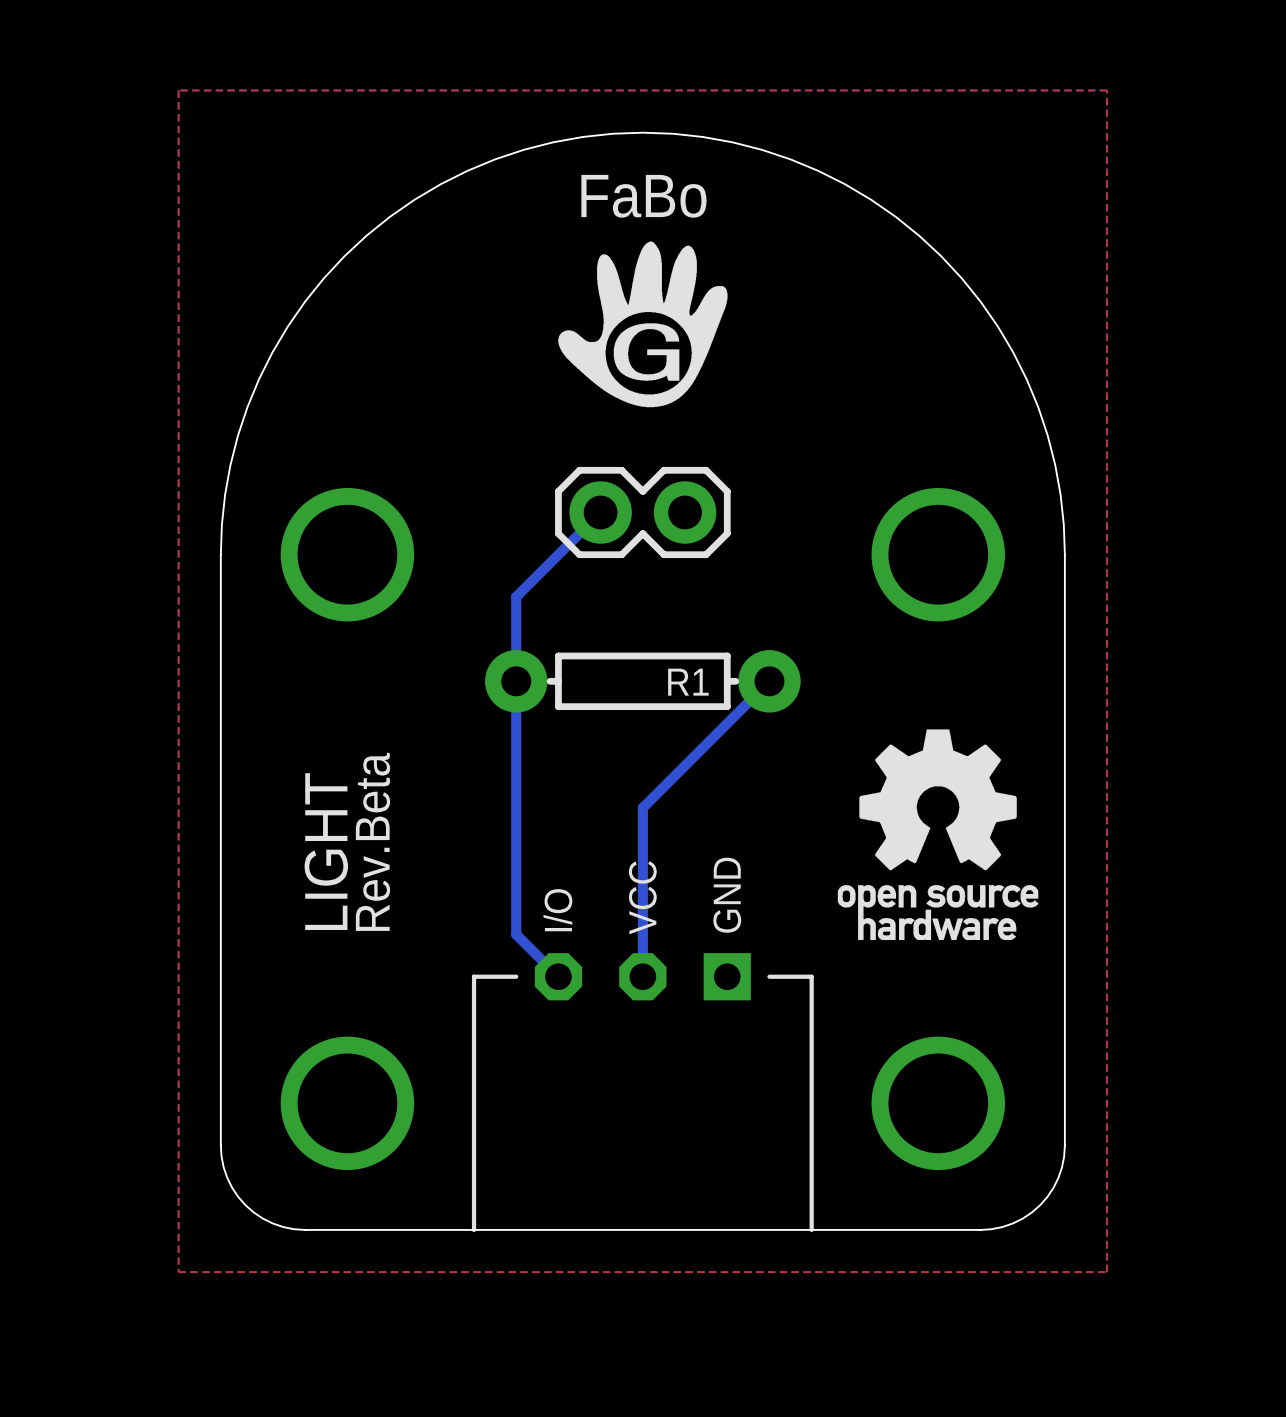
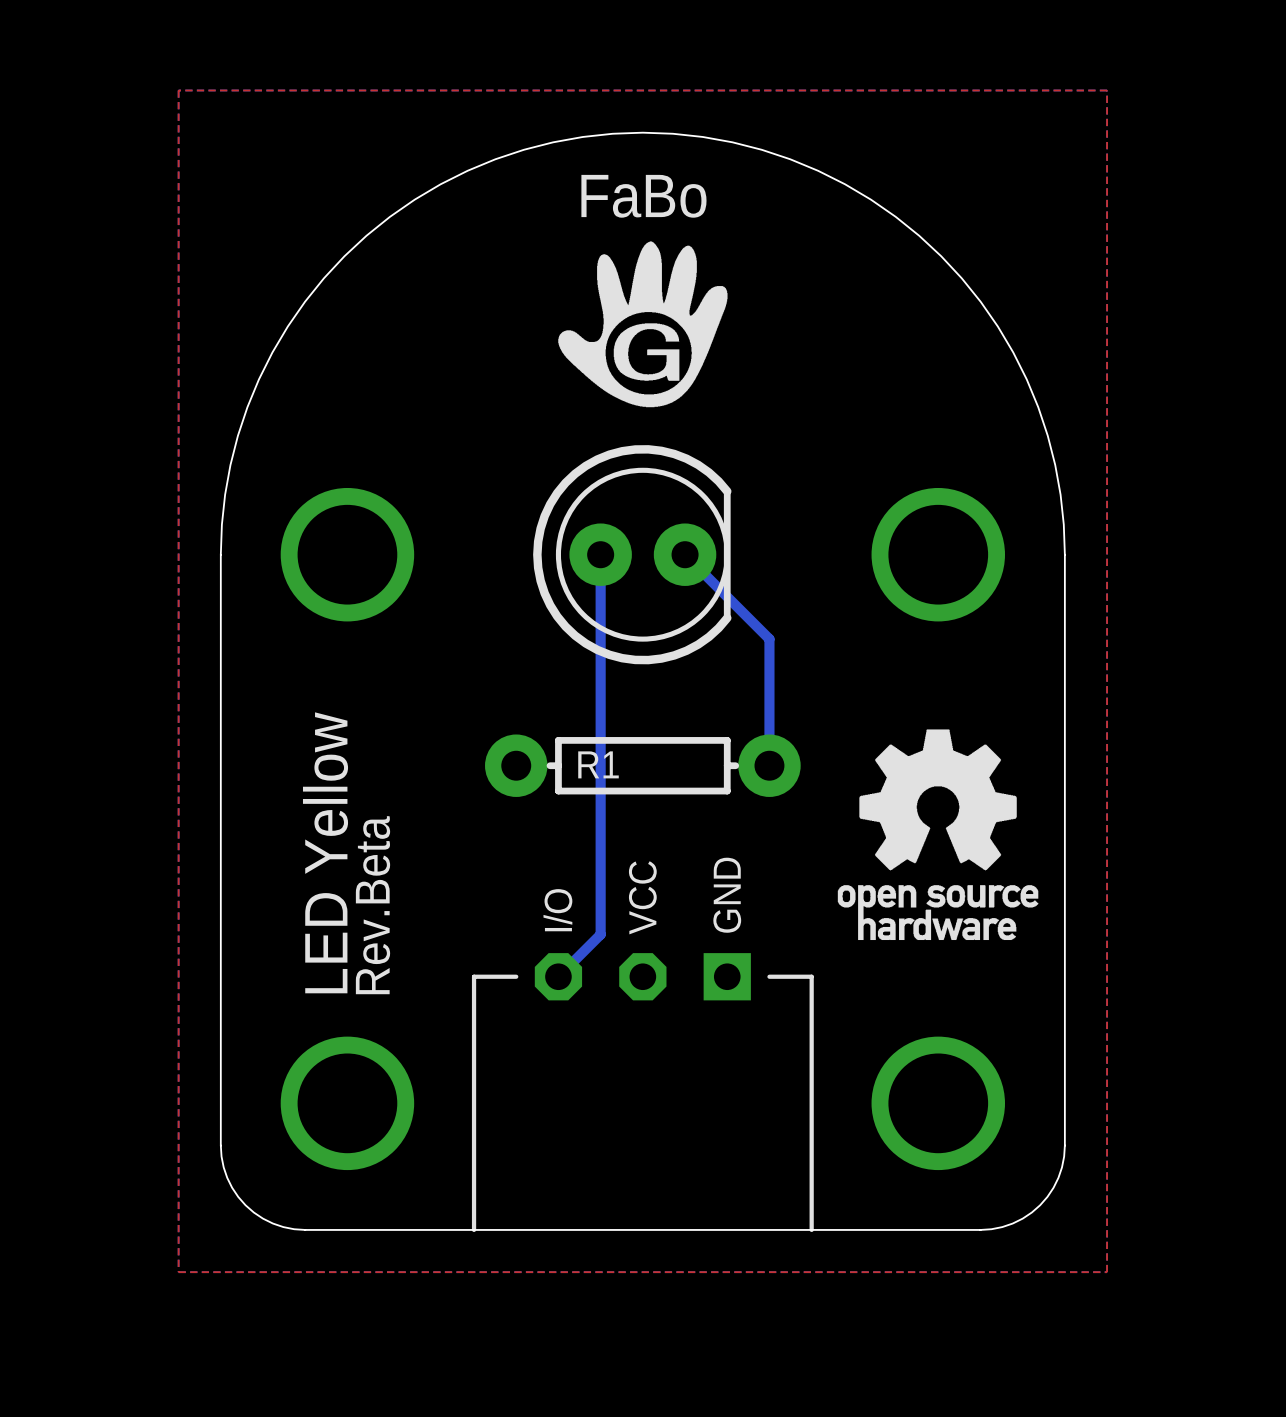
bottom track: (600, 512) (516, 596) (516, 934) (558, 976) -> (600, 554) (600, 934) (558, 976)
part: (642, 512) -> none
part: none -> (632, 554)
bottom track: none -> (685, 554) (769, 639) (769, 765)
R1 position: (642, 681) -> (642, 765)
bottom track: (769, 681) (642, 807) (642, 976) -> none
R1 name position: R1 (688, 682) -> R1 (598, 764)
text position: Rev.Beta (373, 841) -> Rev.Beta (373, 905)
text: LIGHT (326, 851) -> none
text: none -> LED Yellow (325, 852)

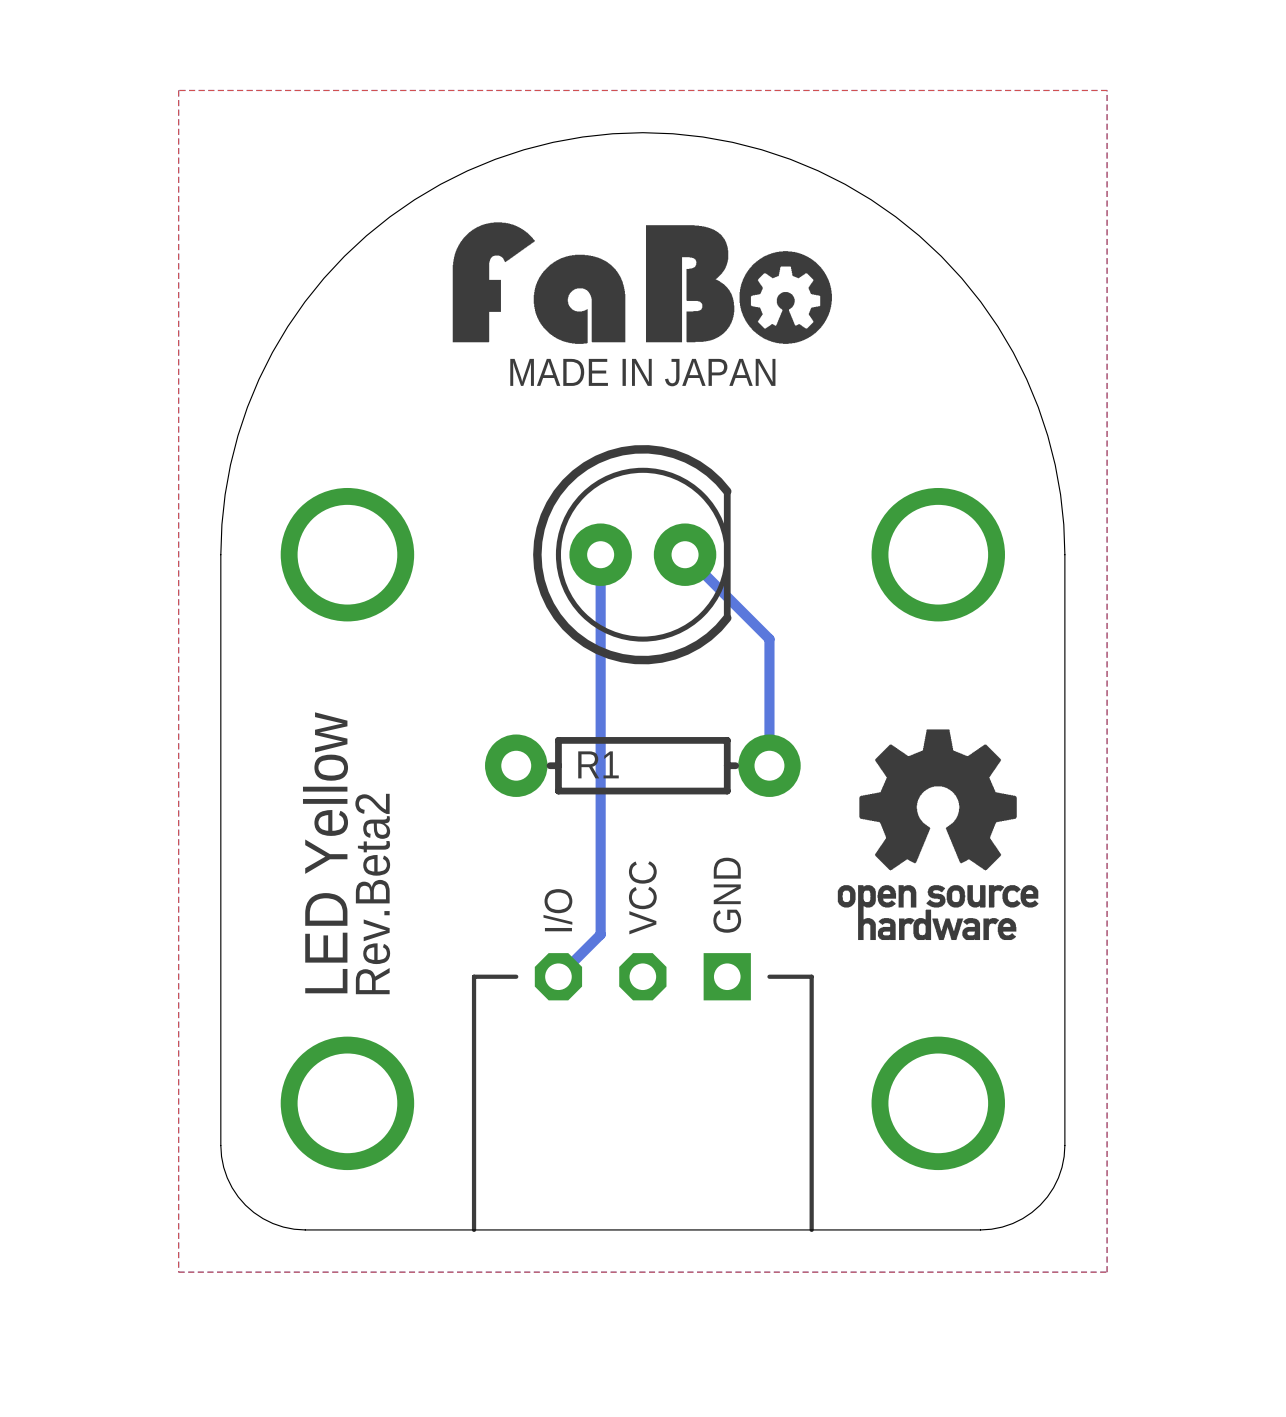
drawing: none -> [452, 222, 832, 344]
drawing: [558, 241, 728, 408] -> none
text: none -> MADE IN JAPAN (642, 372)
text: Rev.Beta (373, 905) -> Rev.Beta2 (372, 894)

